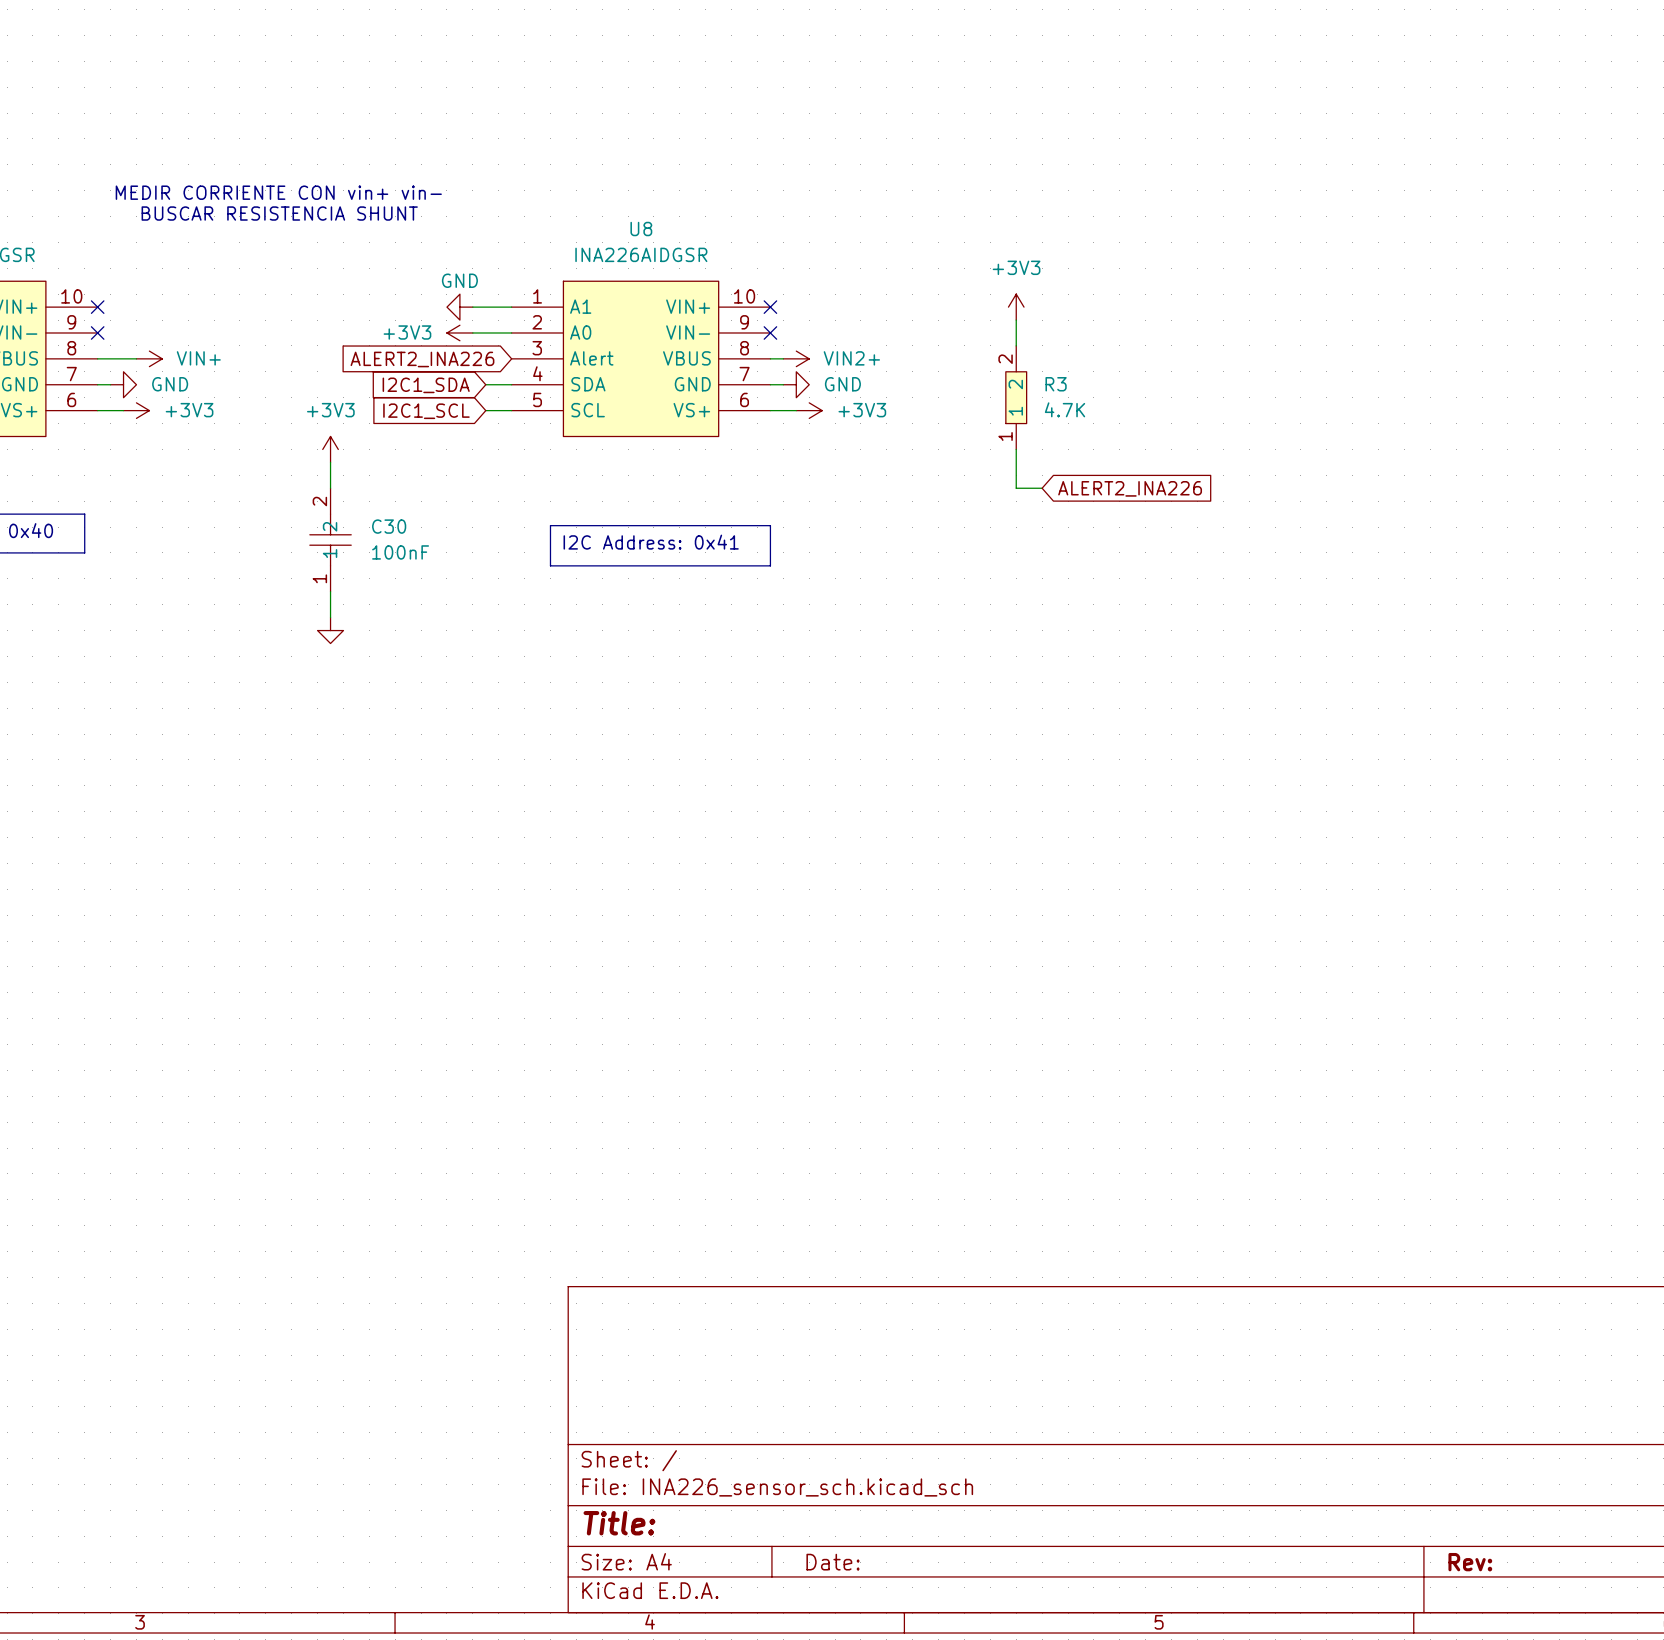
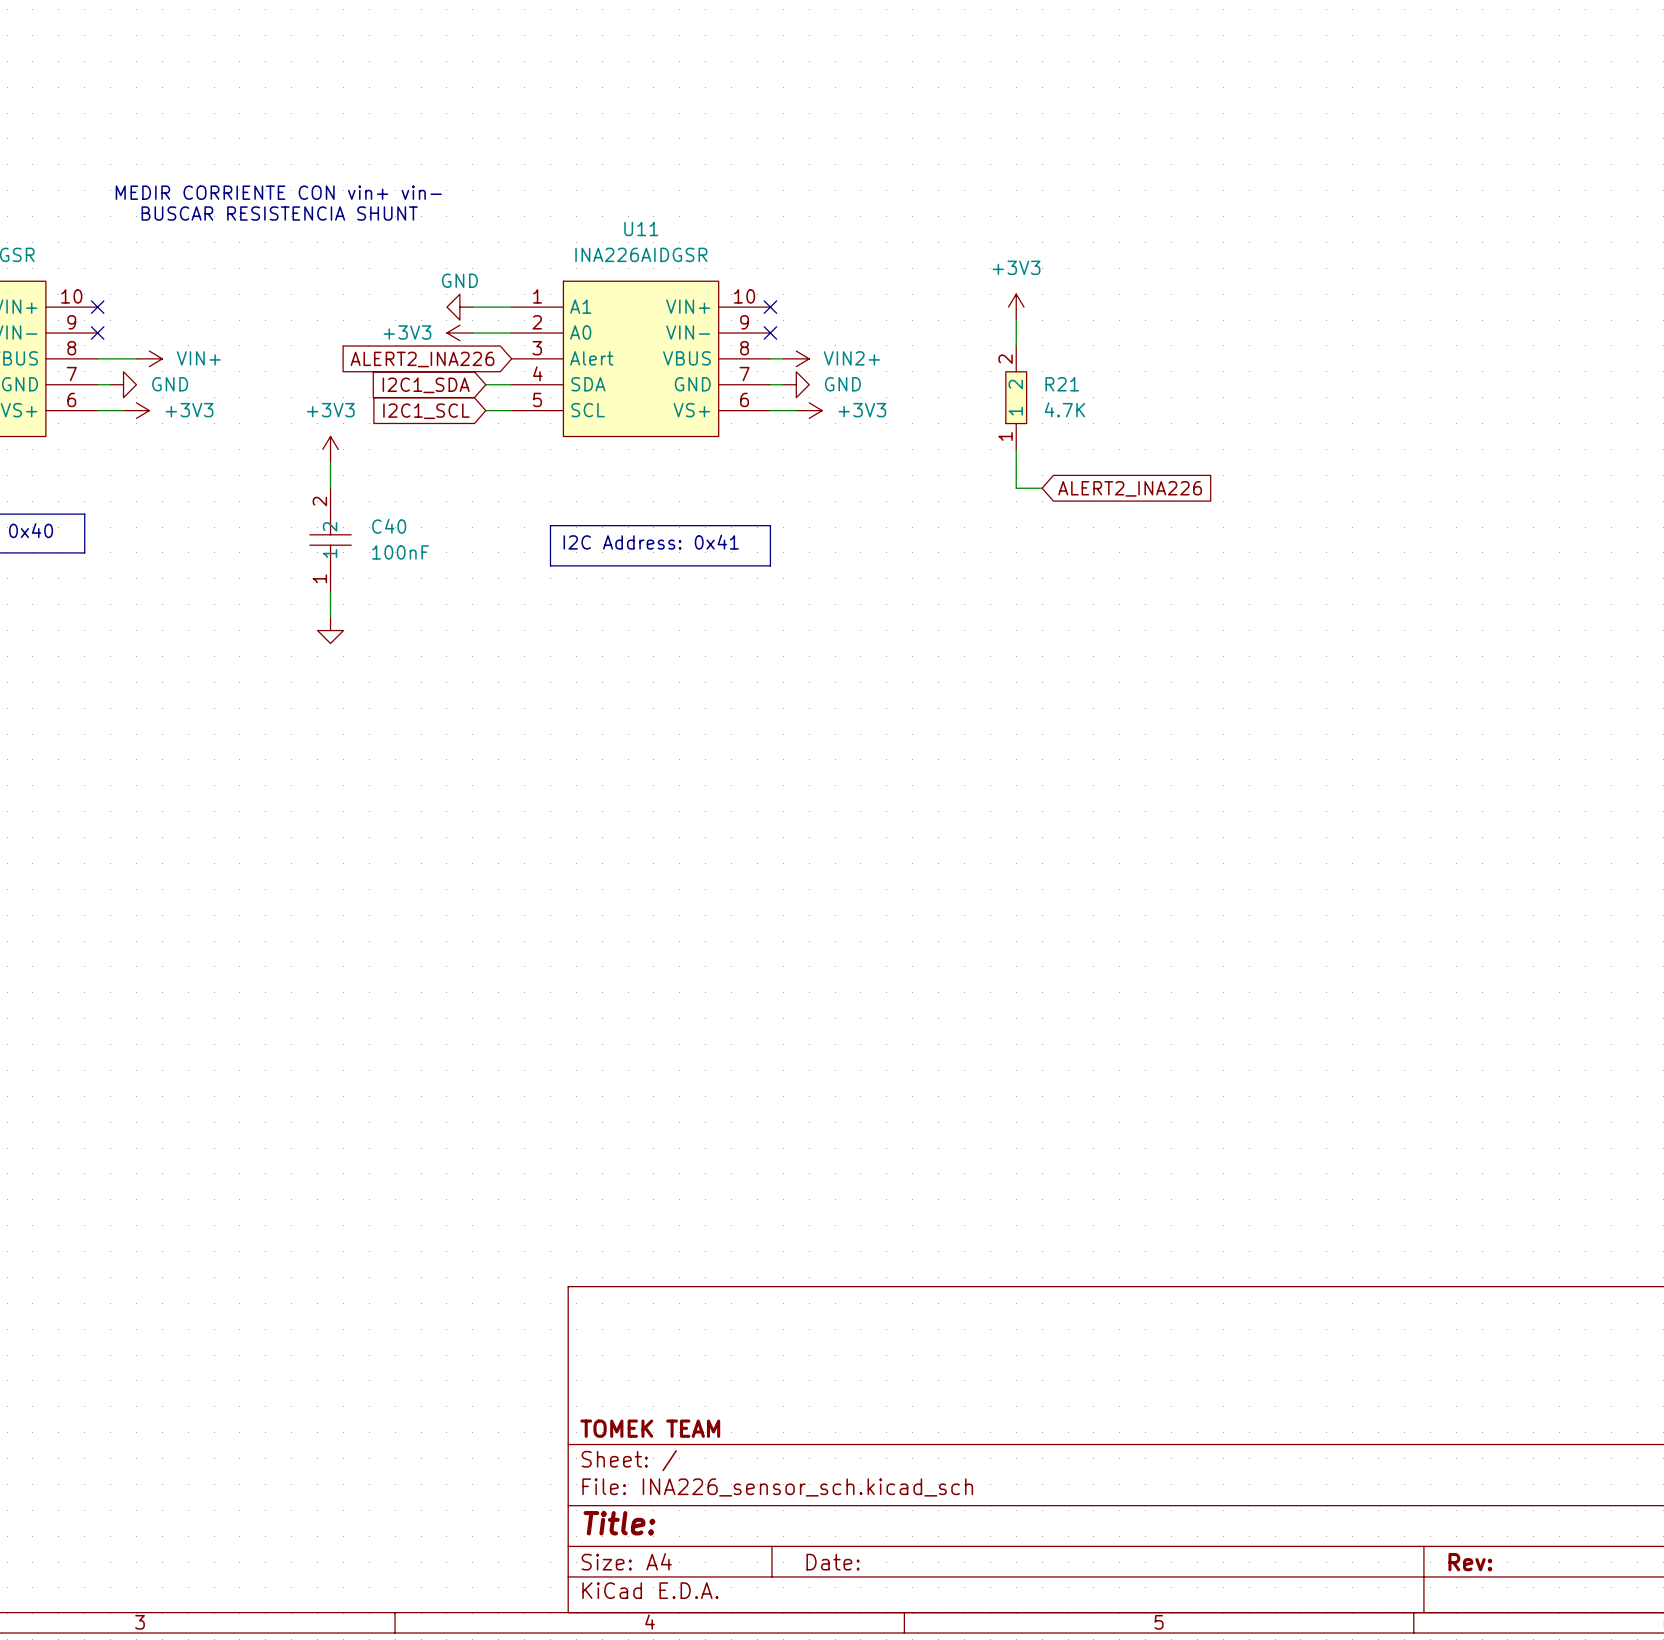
U8 name: U8 (641, 229) -> U11 (641, 229)
R3 name: R3 (1056, 384) -> R21 (1062, 384)
C30 name: C30 (389, 526) -> C40 (389, 526)
title block: none -> TOMEK TEAM (650, 1428)

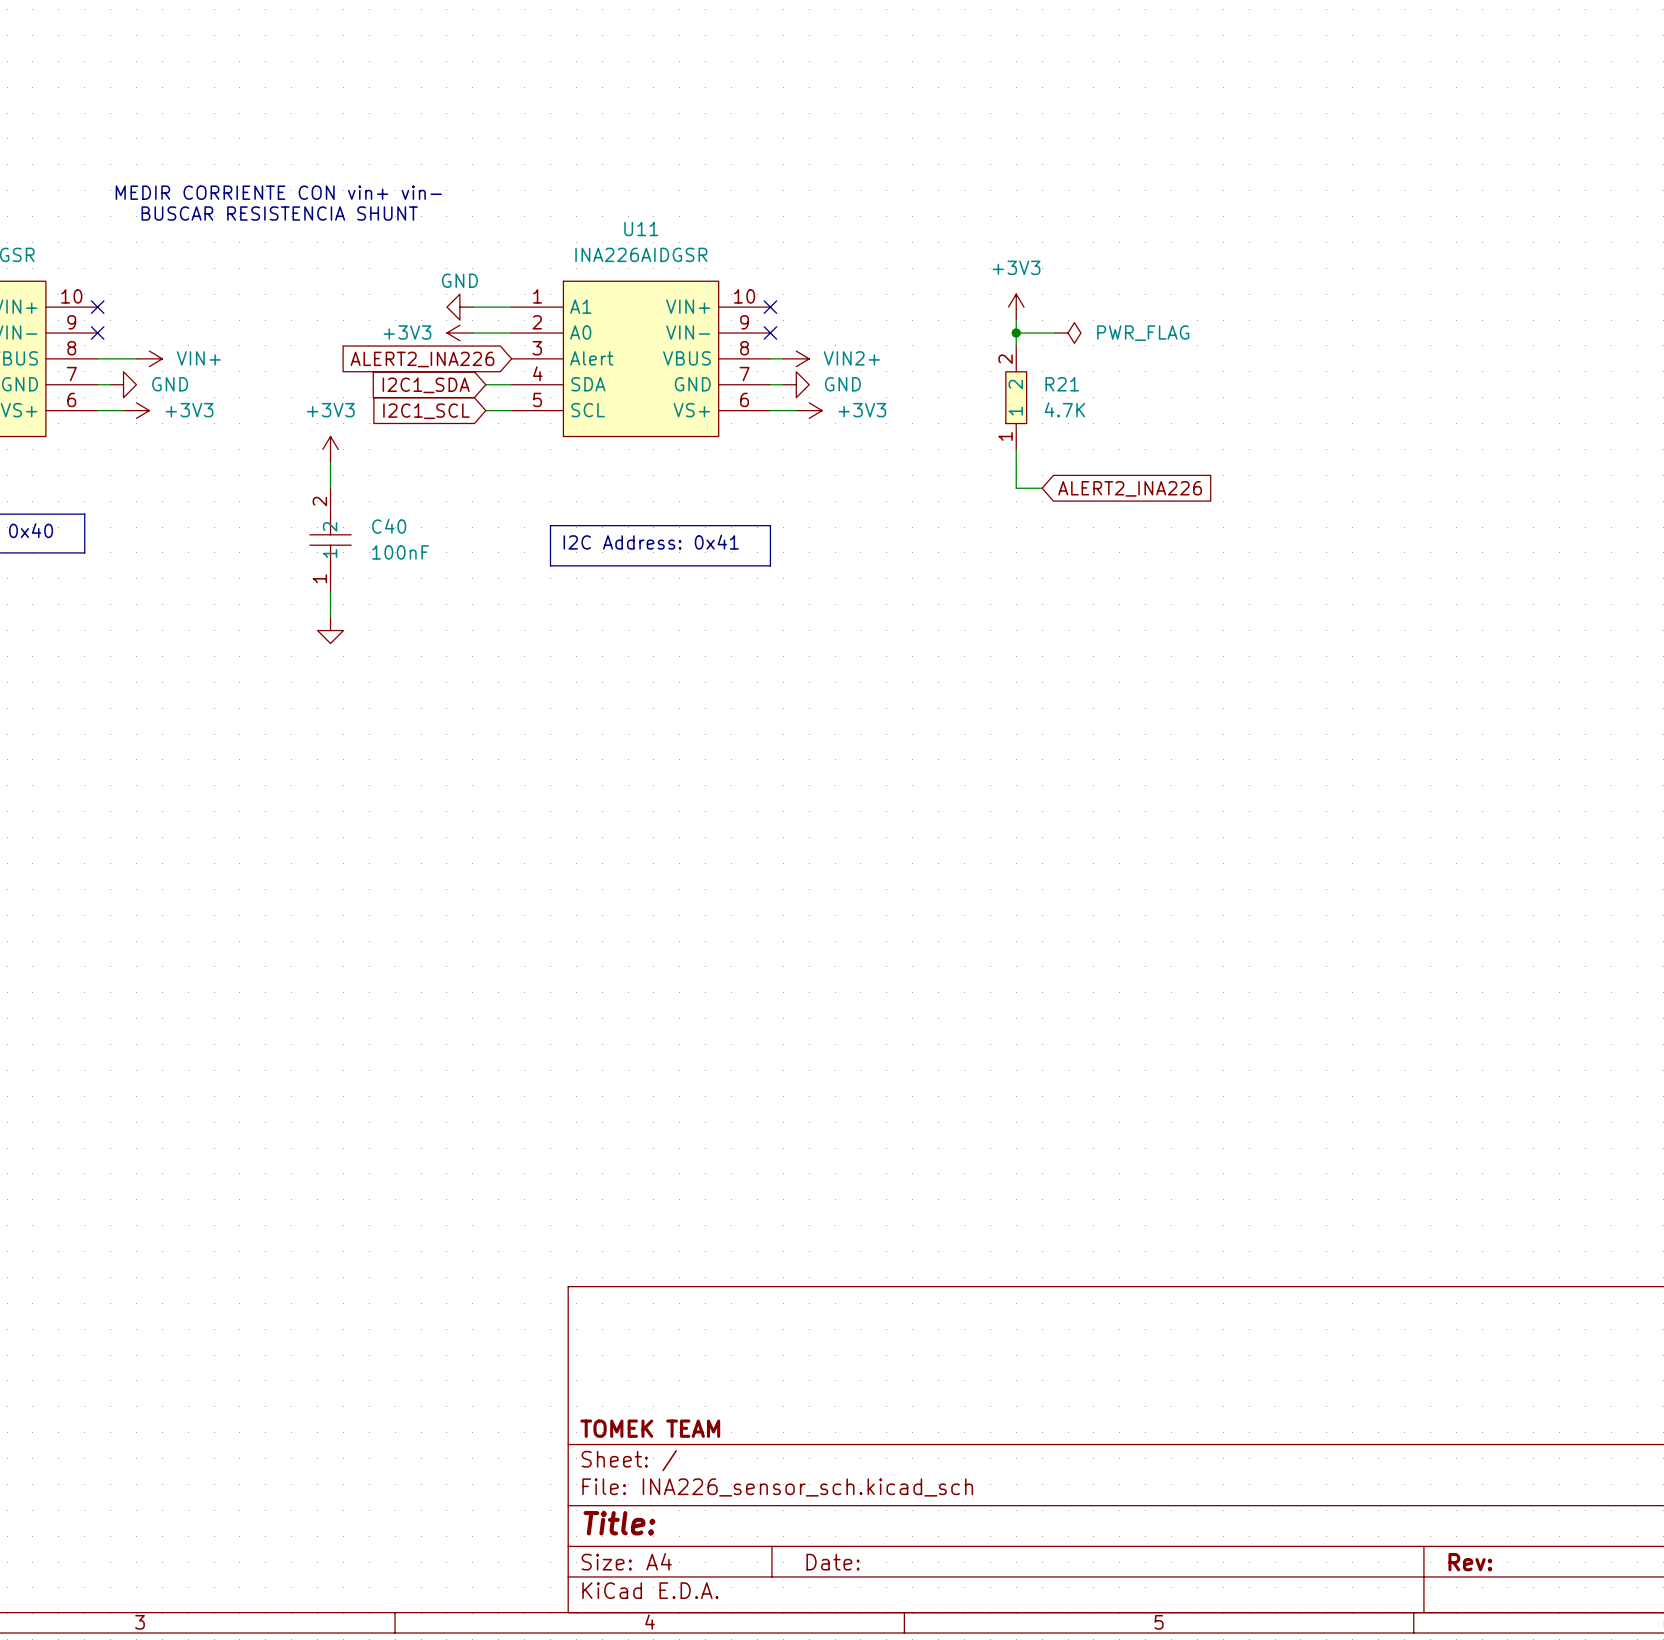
wire: none -> (1016, 332) (1055, 332)
junction: none -> (1016, 332)
power symbol: none -> PWR_FLAG (1068, 332)

